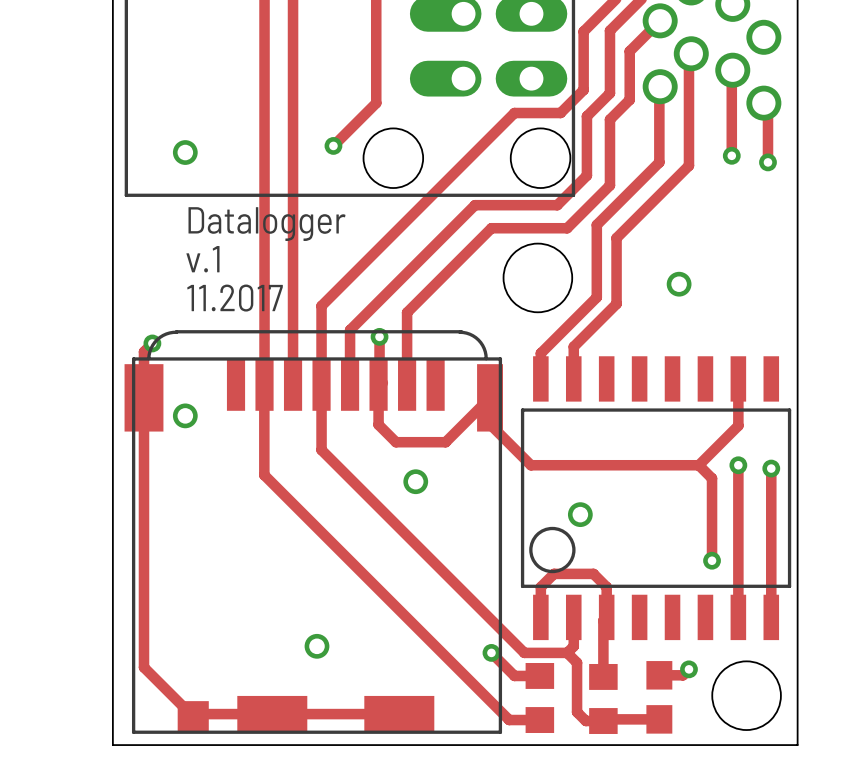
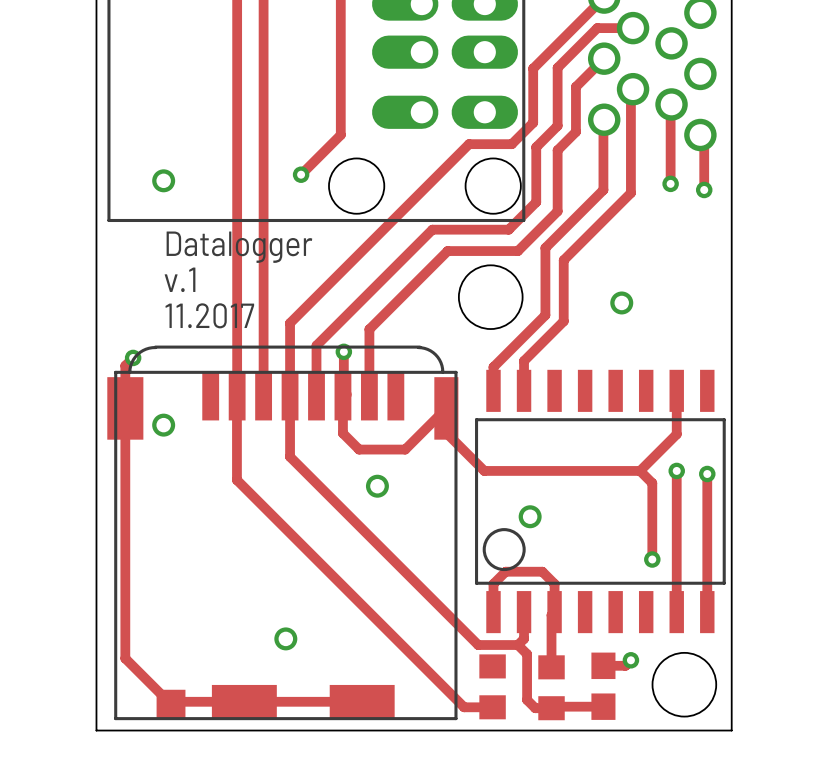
track: (491, 652) (514, 675) (539, 675) -> none
via: (491, 652) -> none

